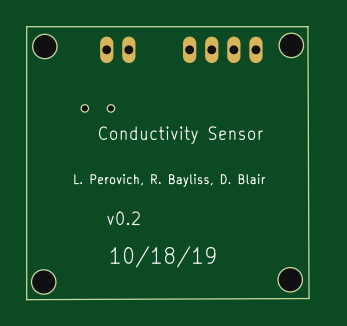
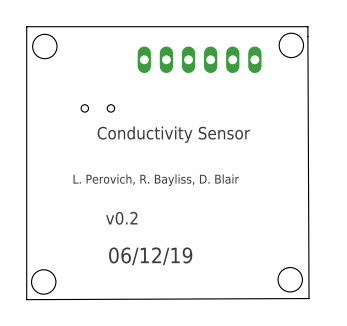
part: (117, 49) -> none
part: (222, 49) -> none
part: none -> (199, 59)
text: 10/18/19 (163, 256) -> 06/12/19 (150, 256)

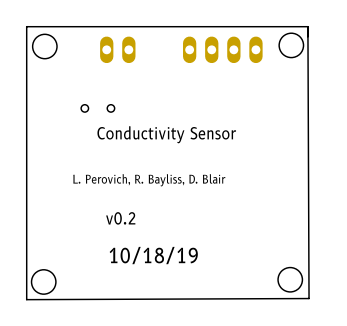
part: none -> (117, 49)
part: none -> (222, 49)
part: (199, 59) -> none
text: 06/12/19 (150, 256) -> 10/18/19 (153, 255)

